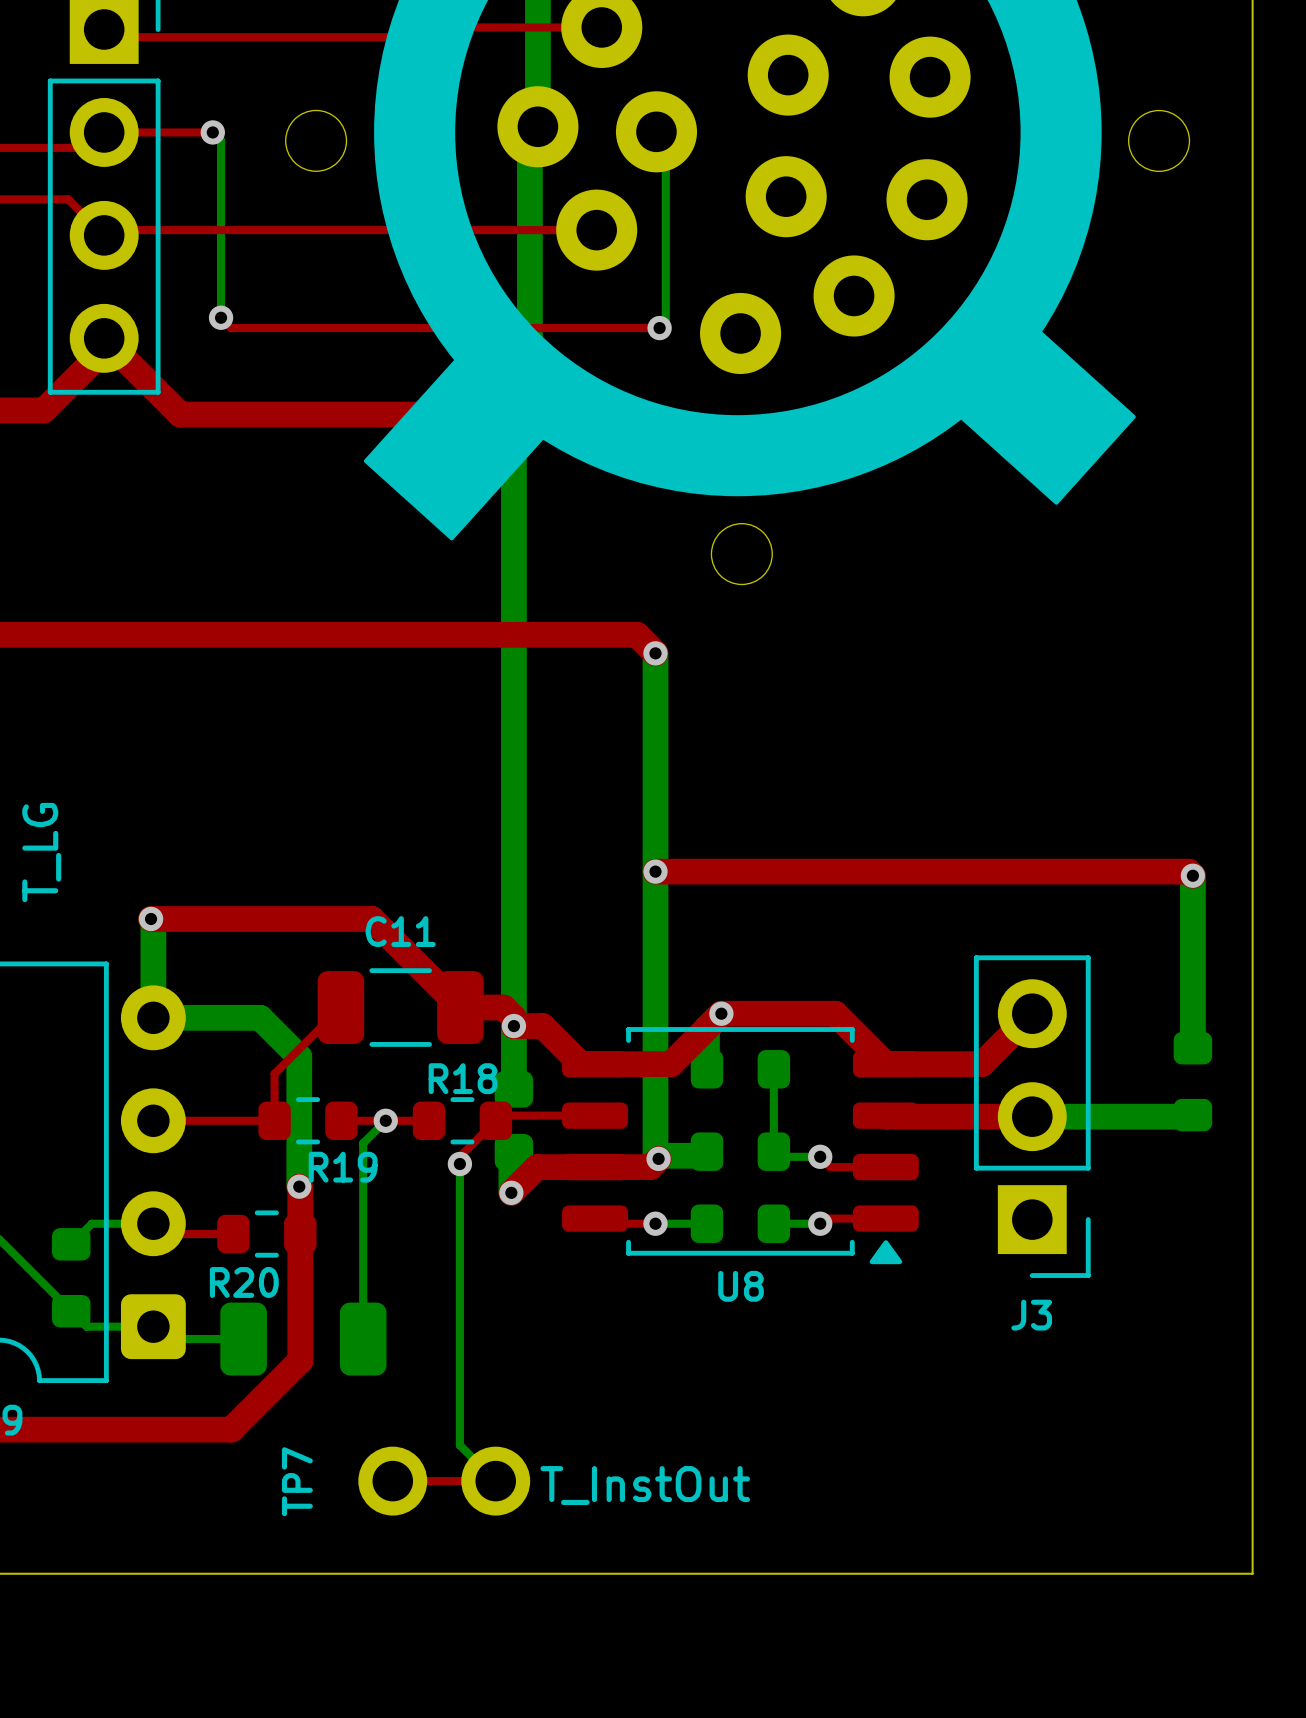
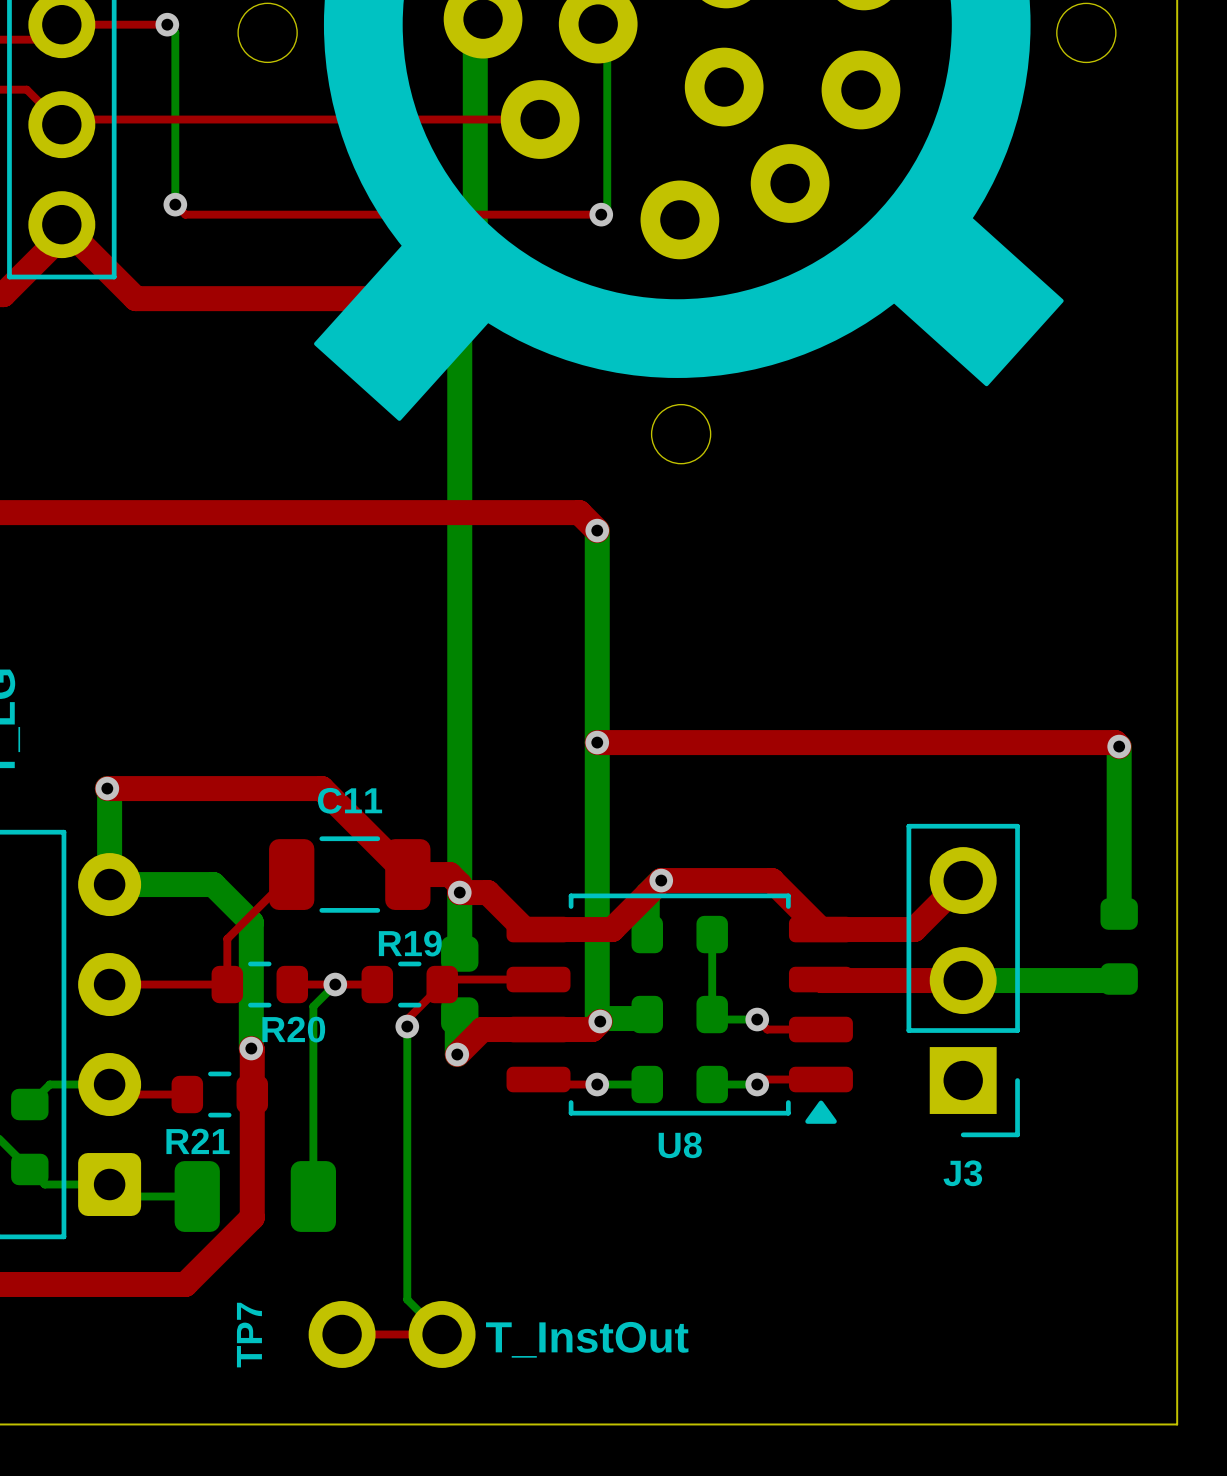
R18 name: R18 (463, 1078) -> R19 (410, 943)
R19 name: R19 (343, 1167) -> R20 (293, 1029)
R20 name: R20 (244, 1282) -> R21 (198, 1141)

